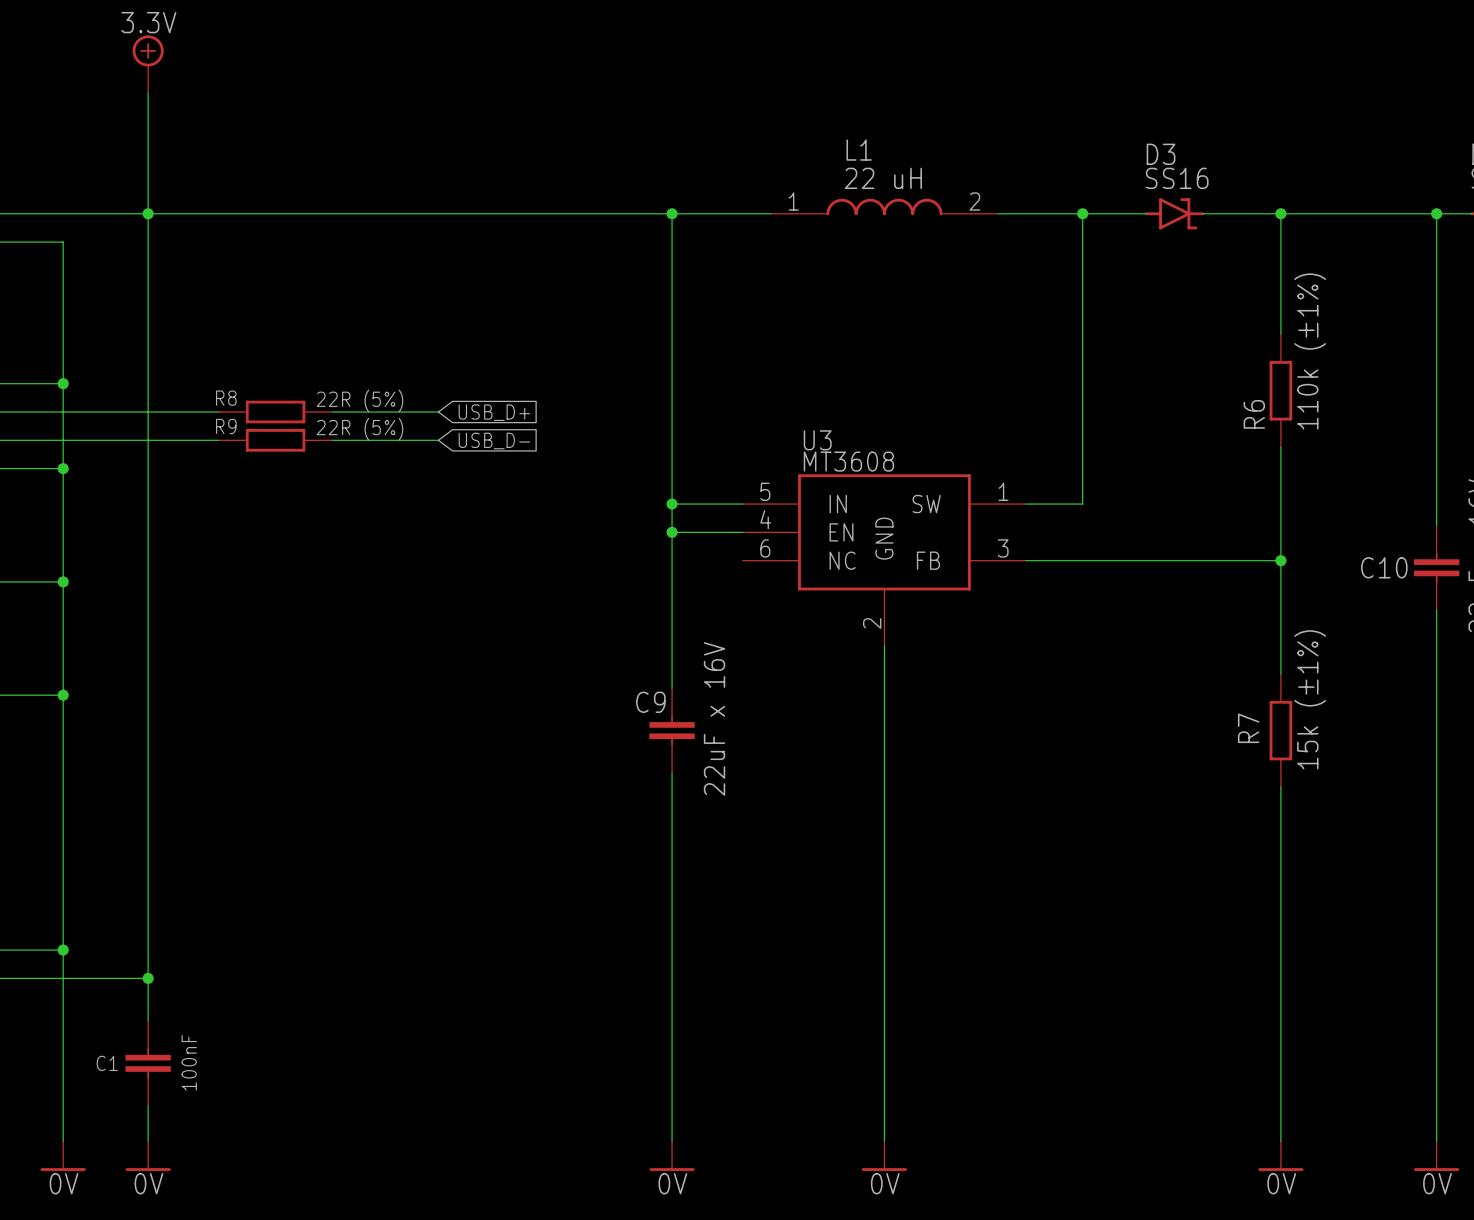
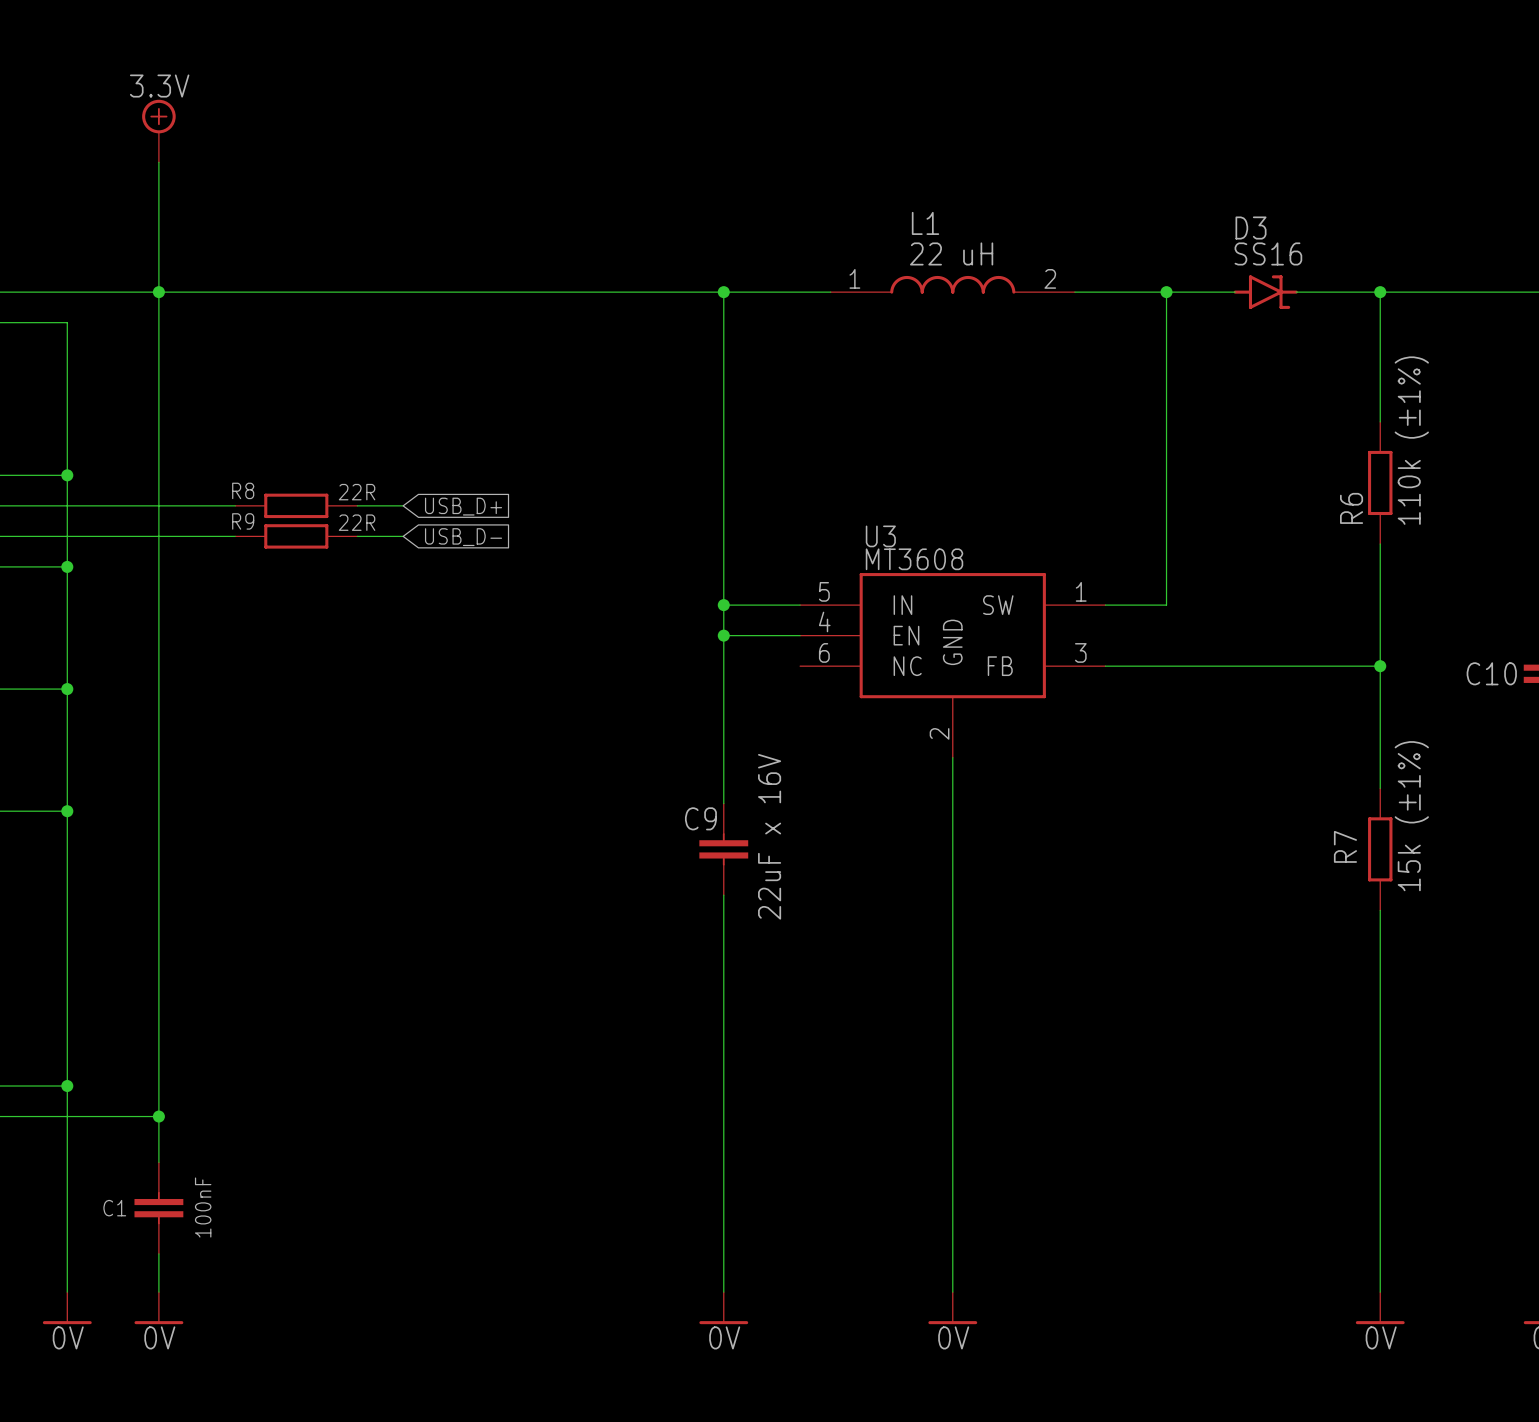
R8 value: 22R (5%) (359, 400) -> 22R (357, 492)
wire: (374, 412) (438, 412) -> none
global label position: USB_D+ (494, 412) -> USB_D+ (463, 506)
R9 value: 22R (5%) (359, 429) -> 22R (357, 522)
wire: (374, 440) (438, 440) -> none
global label position: USB_D- (494, 441) -> USB_D- (463, 537)

